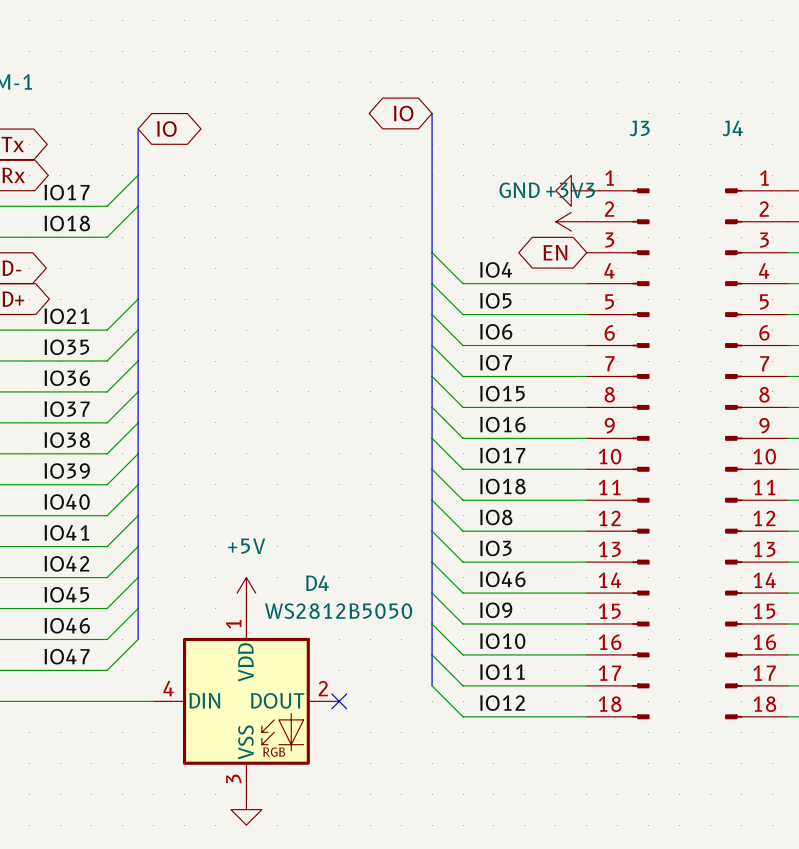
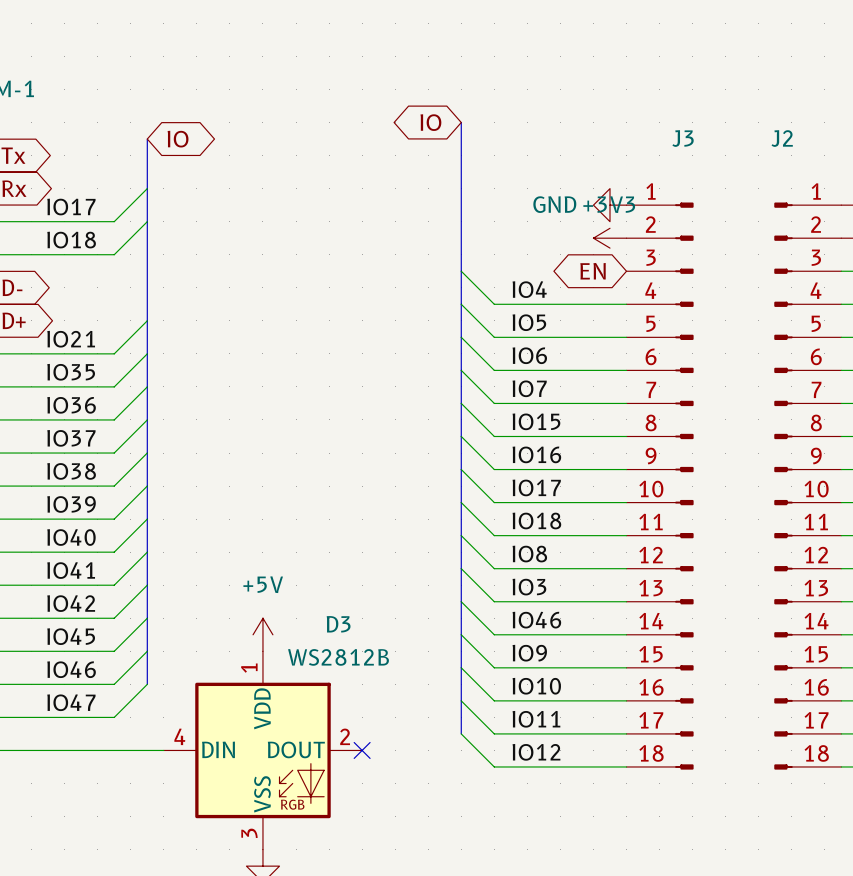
J4 name: J4 (732, 128) -> J2 (782, 138)
D4 name: D4 (317, 583) -> D3 (338, 624)
D4 value: WS2812B5050 (338, 611) -> WS2812B (338, 657)

